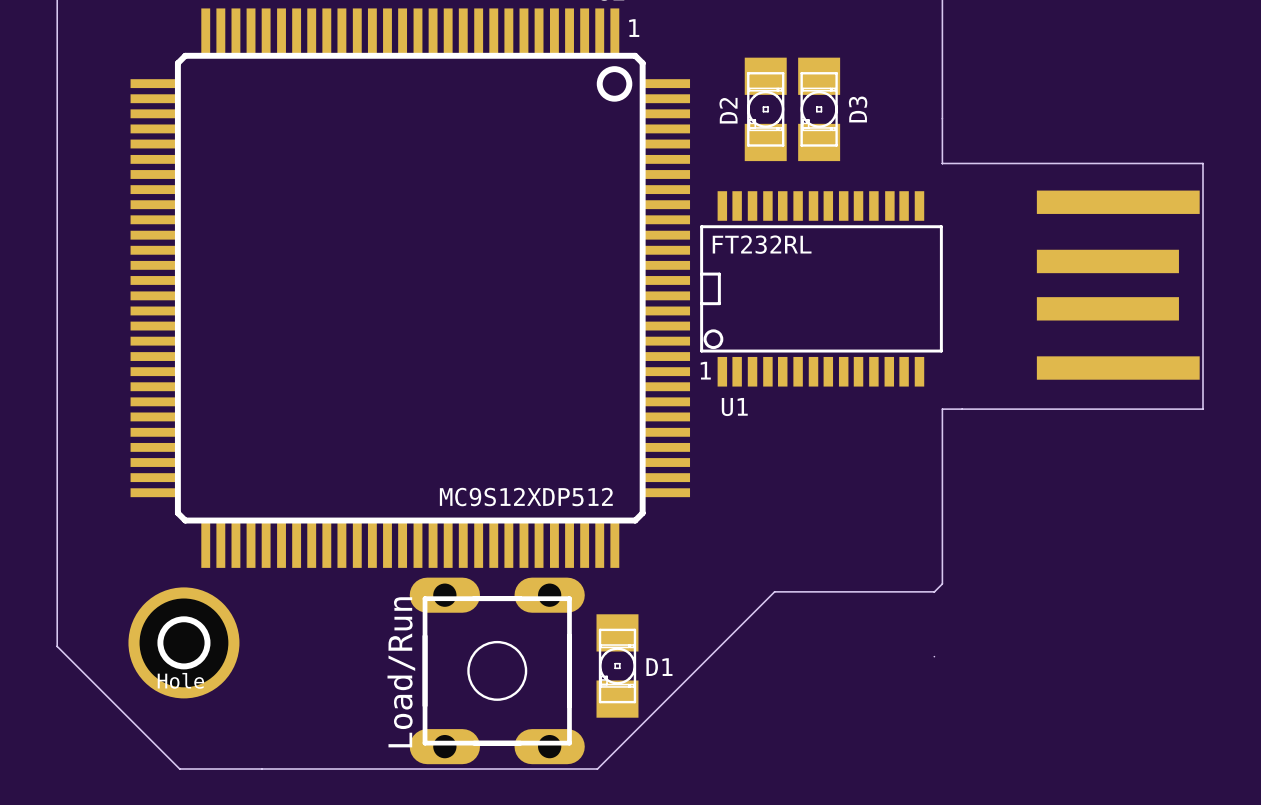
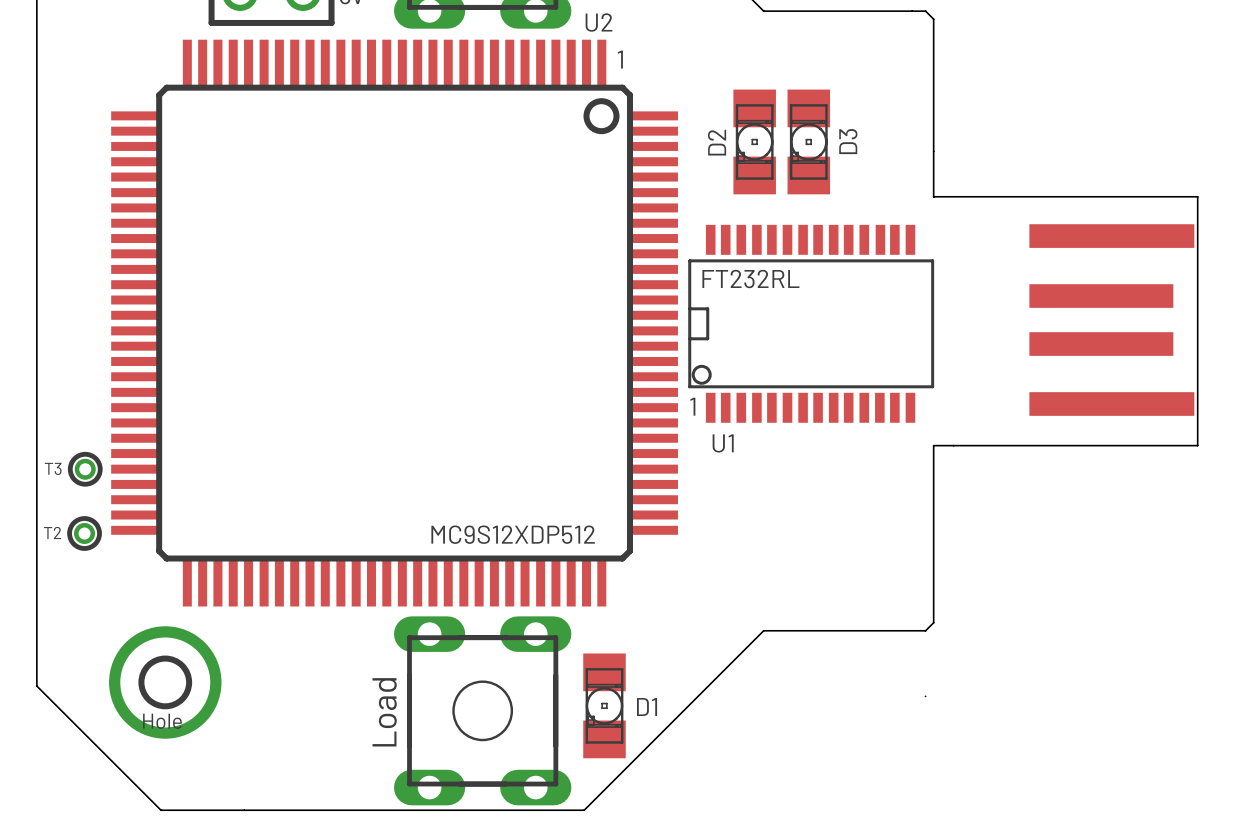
part: none -> T3 (85, 469)
part: none -> T2 (84, 533)
part value: Load/Run (401, 672) -> Load (384, 712)

